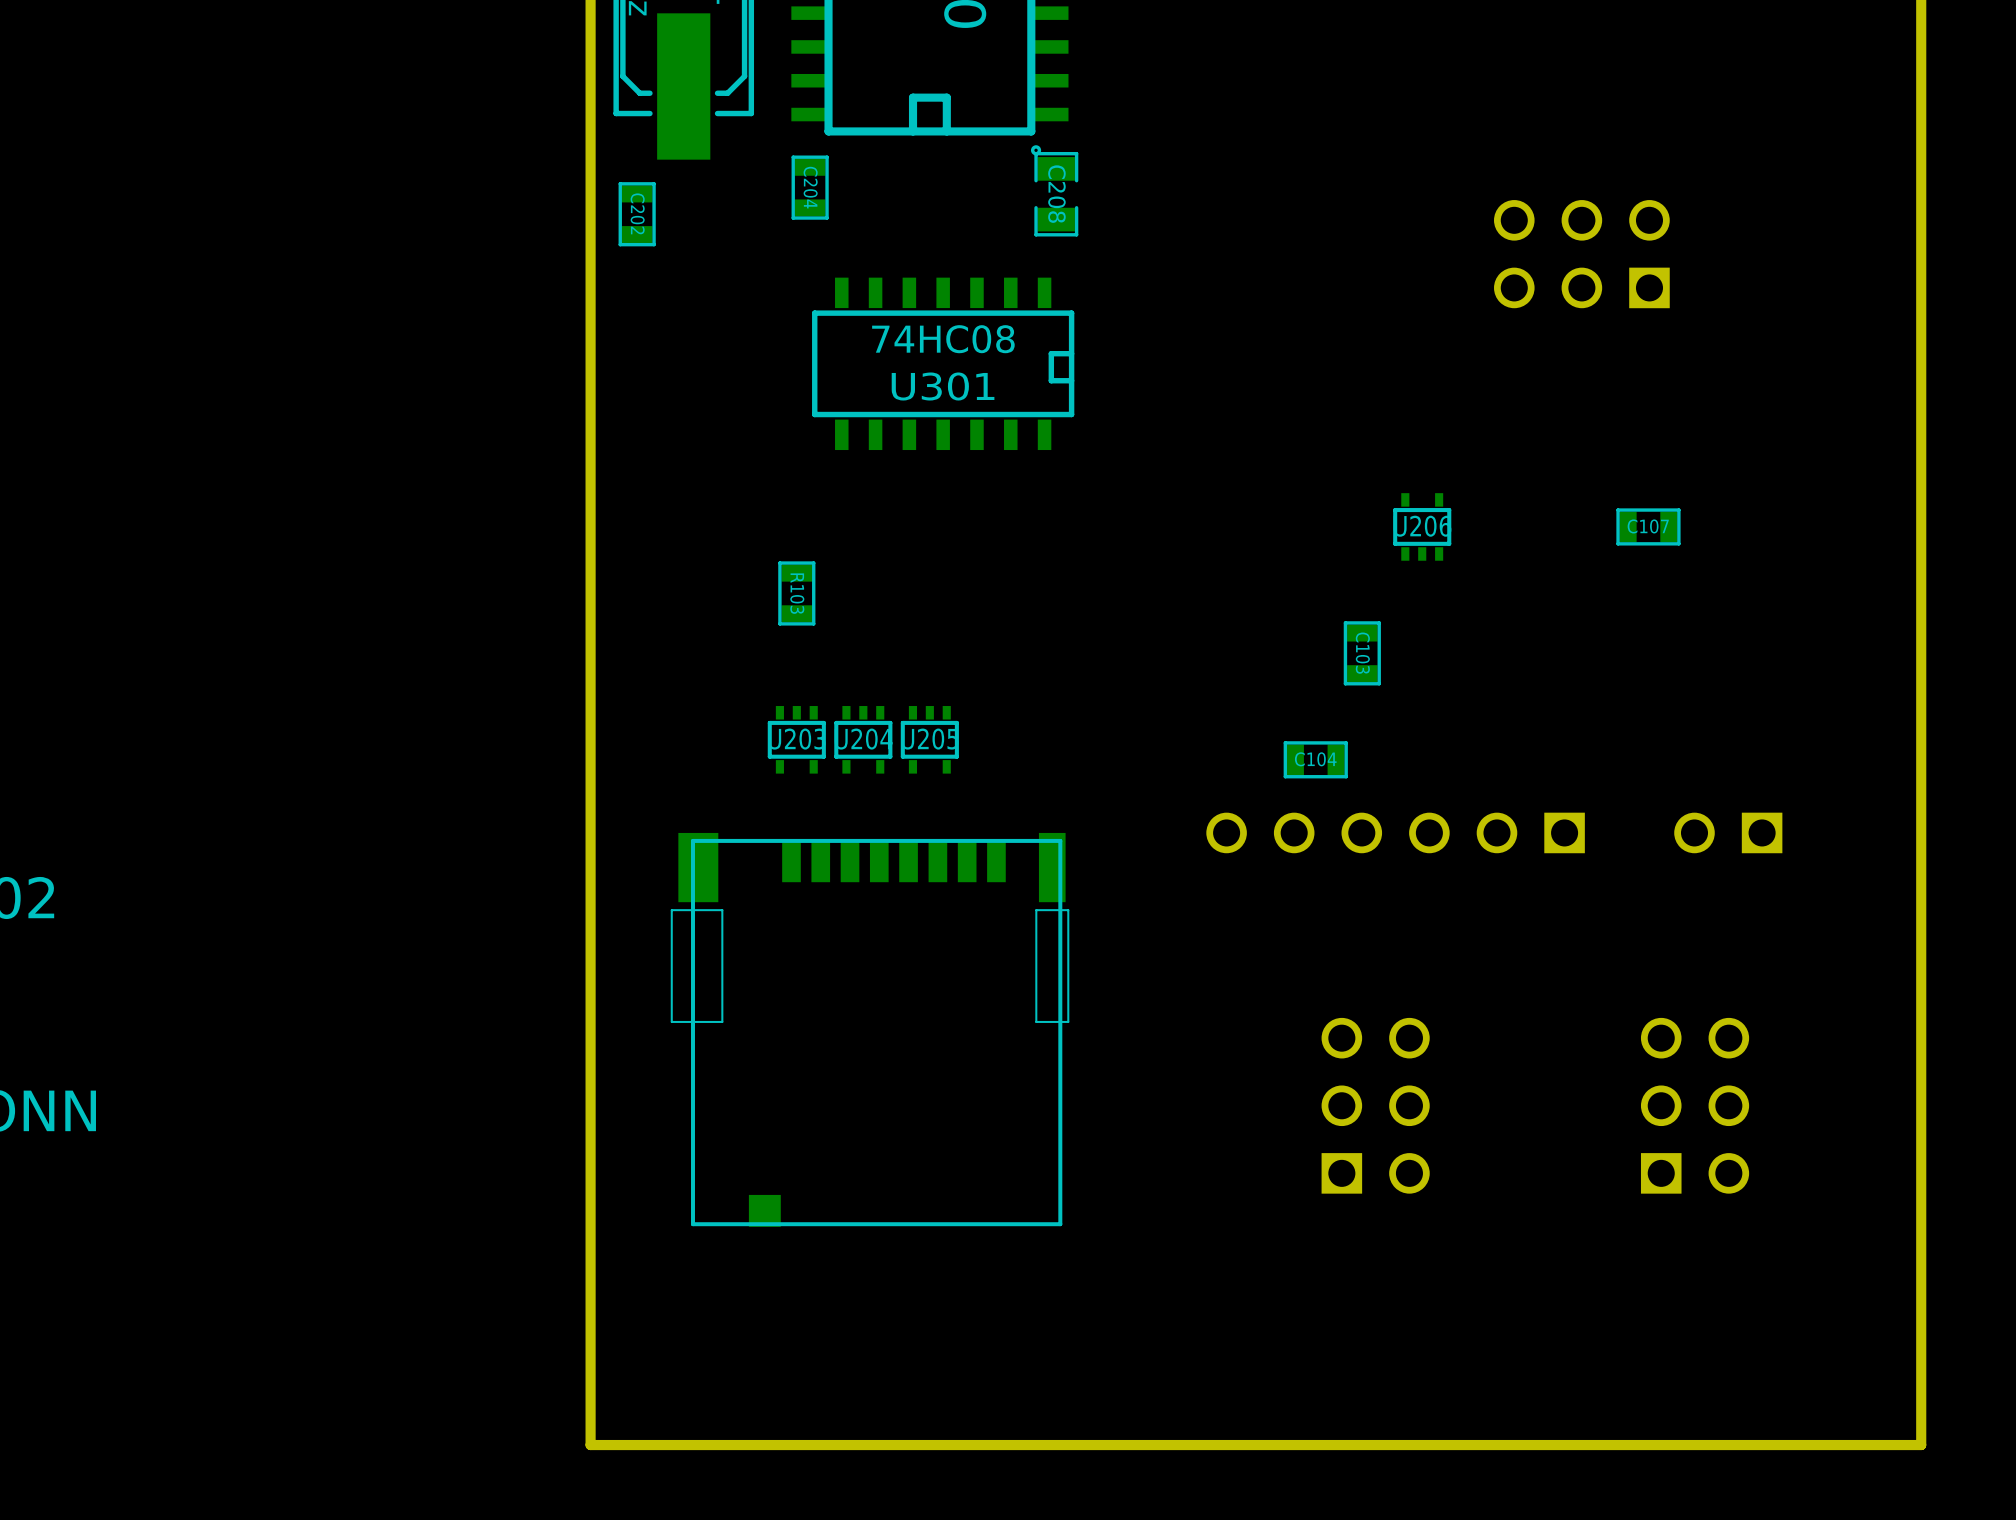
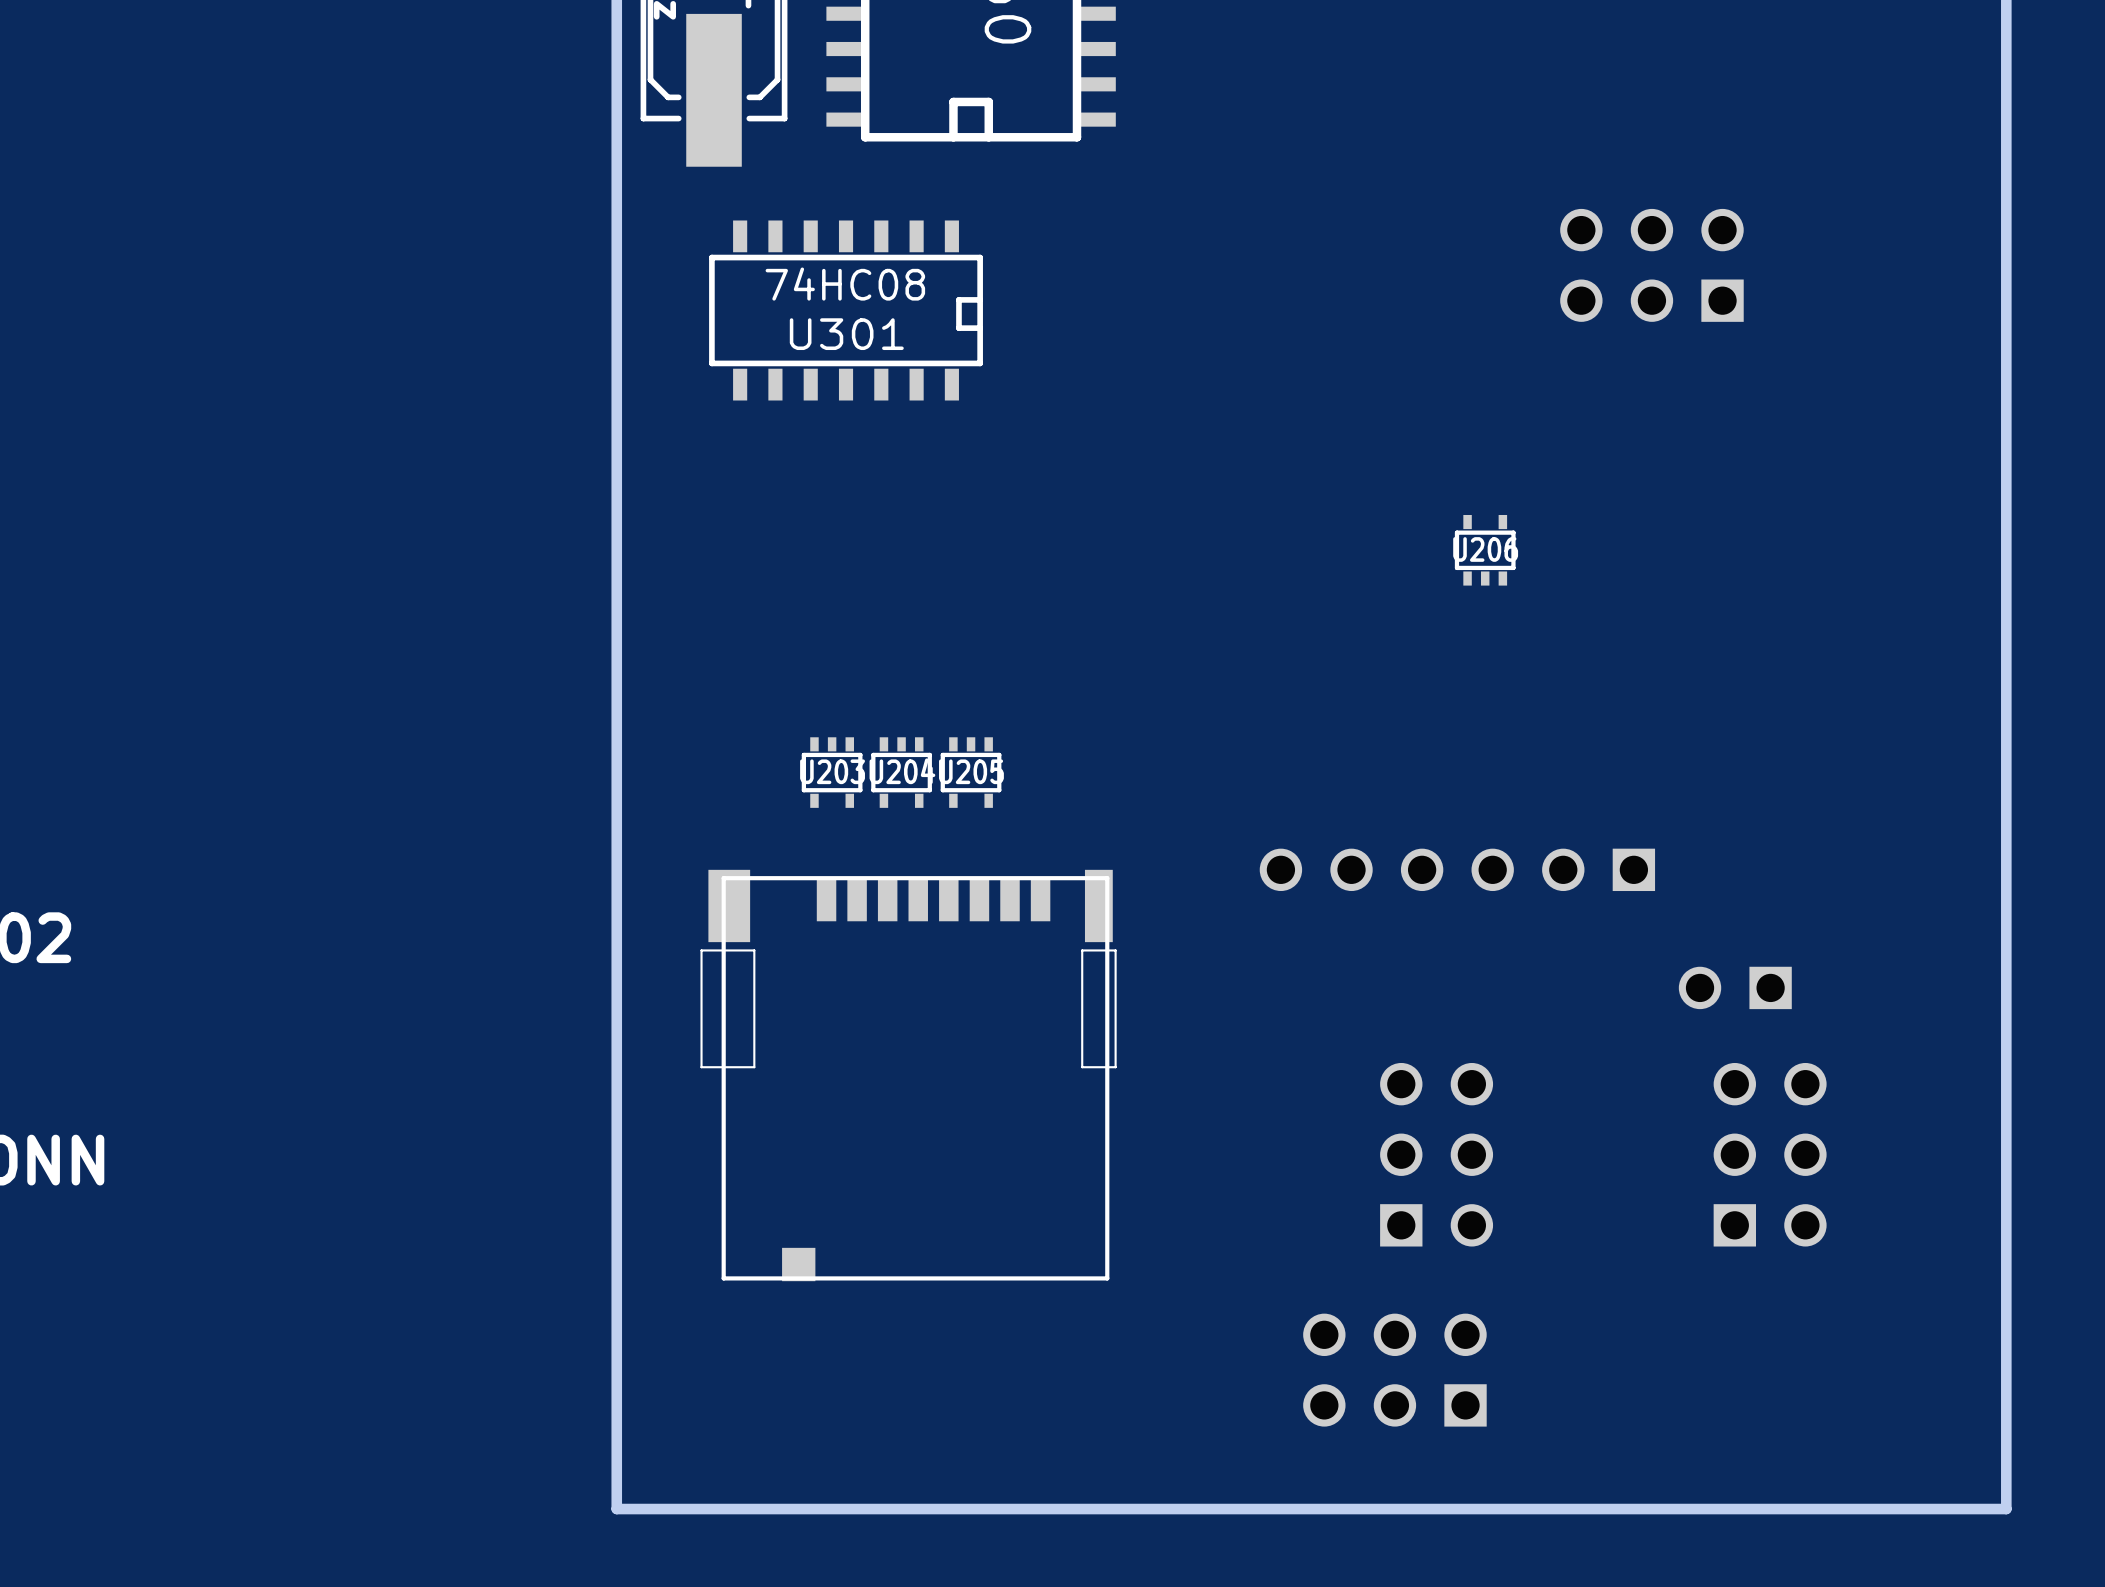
C204: (810, 187) -> none
C208: (1054, 190) -> none
C202: (637, 214) -> none
U301 position: (943, 363) -> (846, 310)
C107: (1648, 526) -> none
R103: (796, 593) -> none
C103: (1362, 653) -> none
C104: (1315, 759) -> none
part position: (1728, 832) -> (1735, 987)
part: none -> (1394, 1370)

